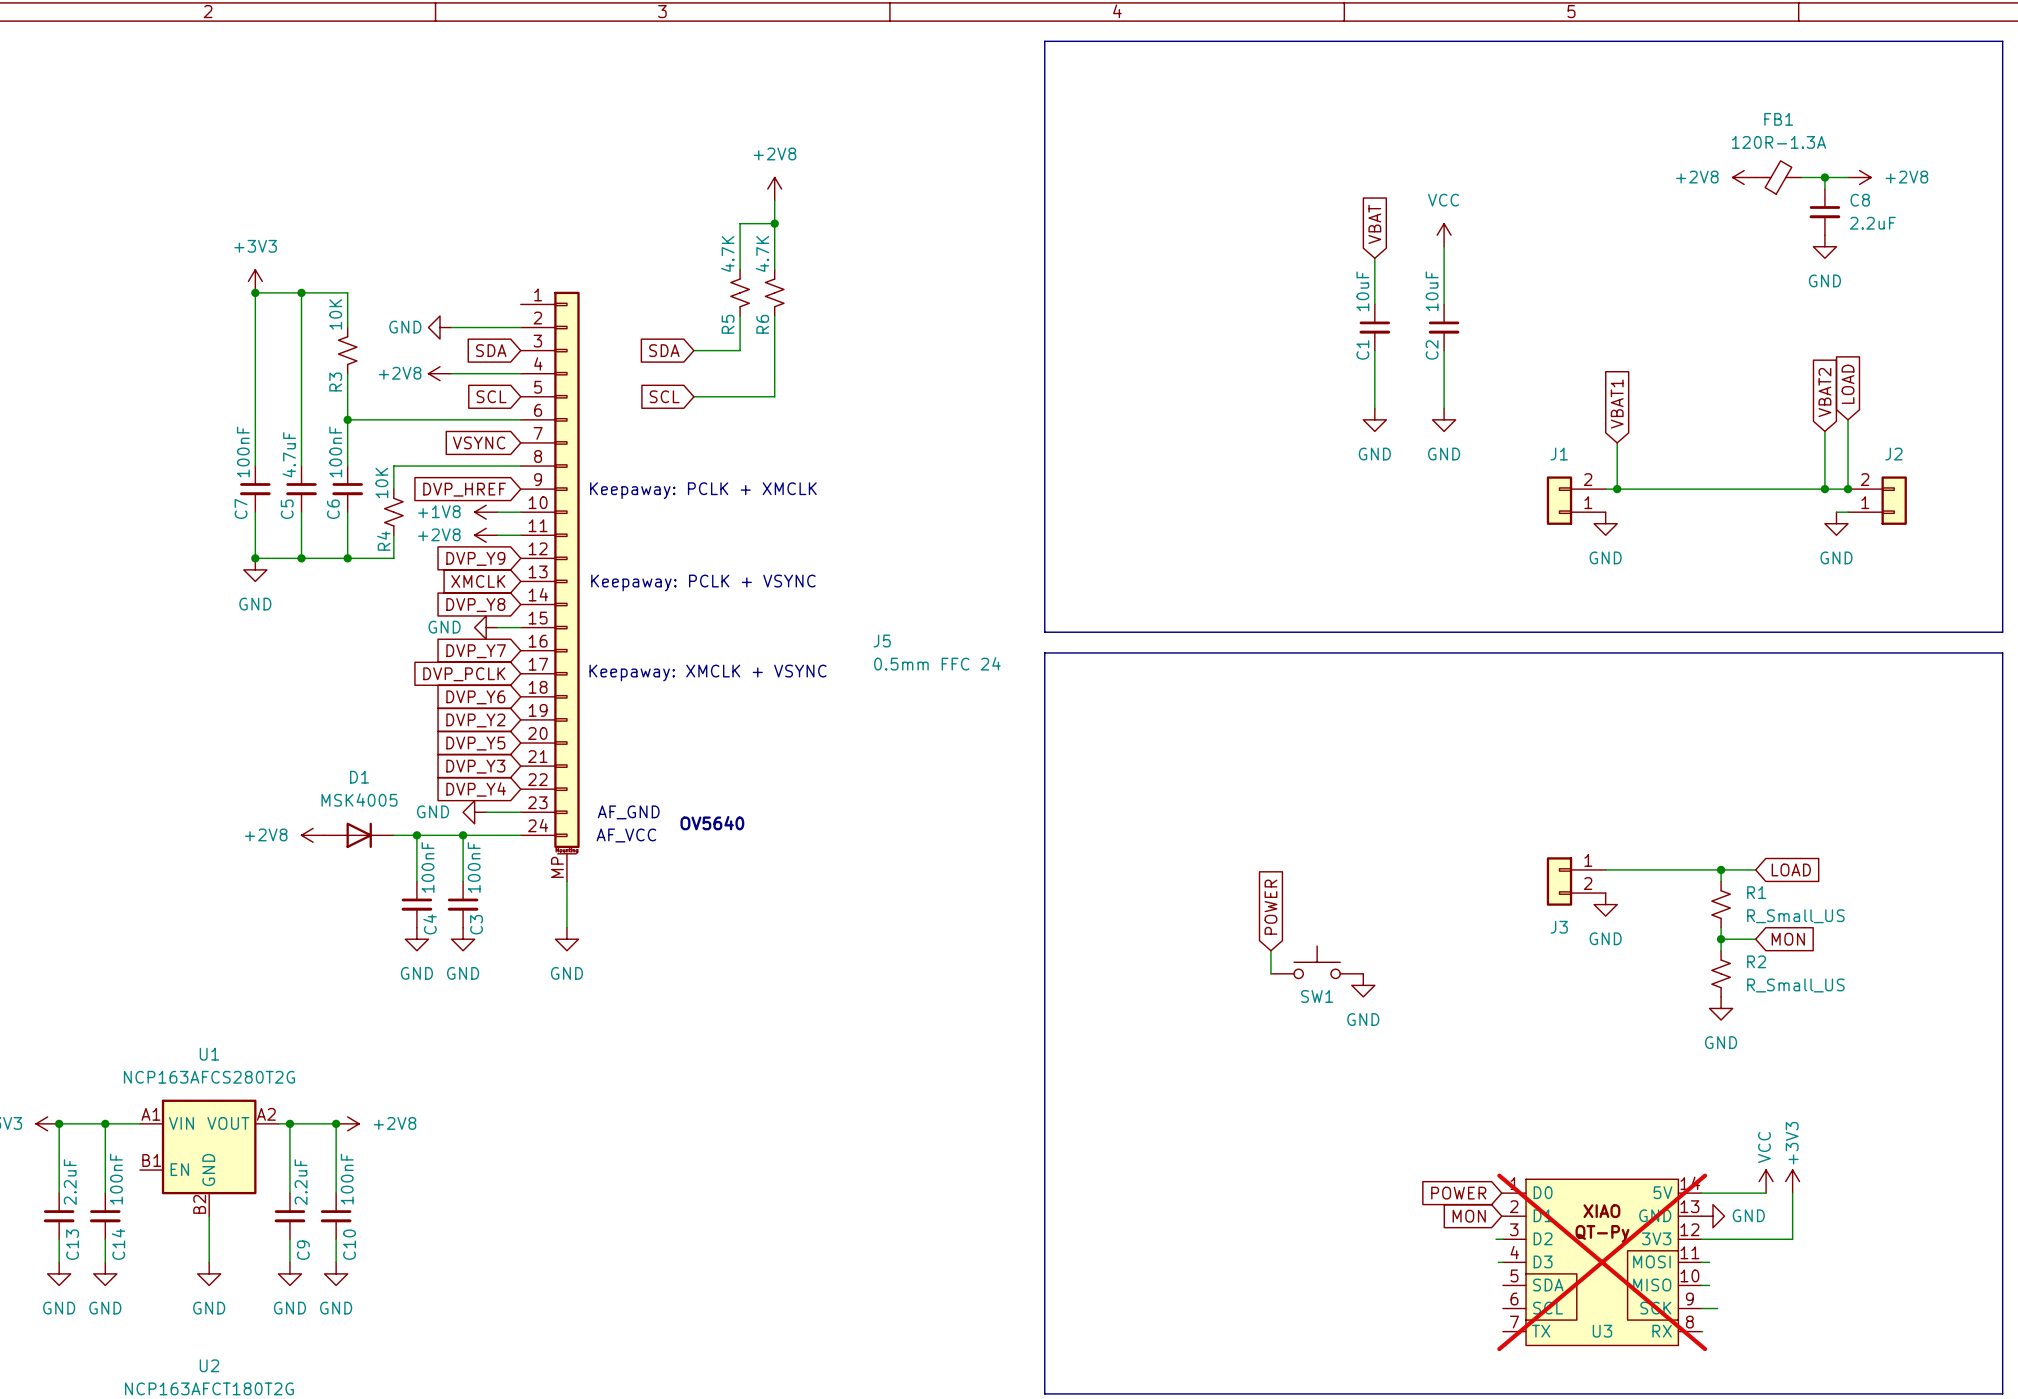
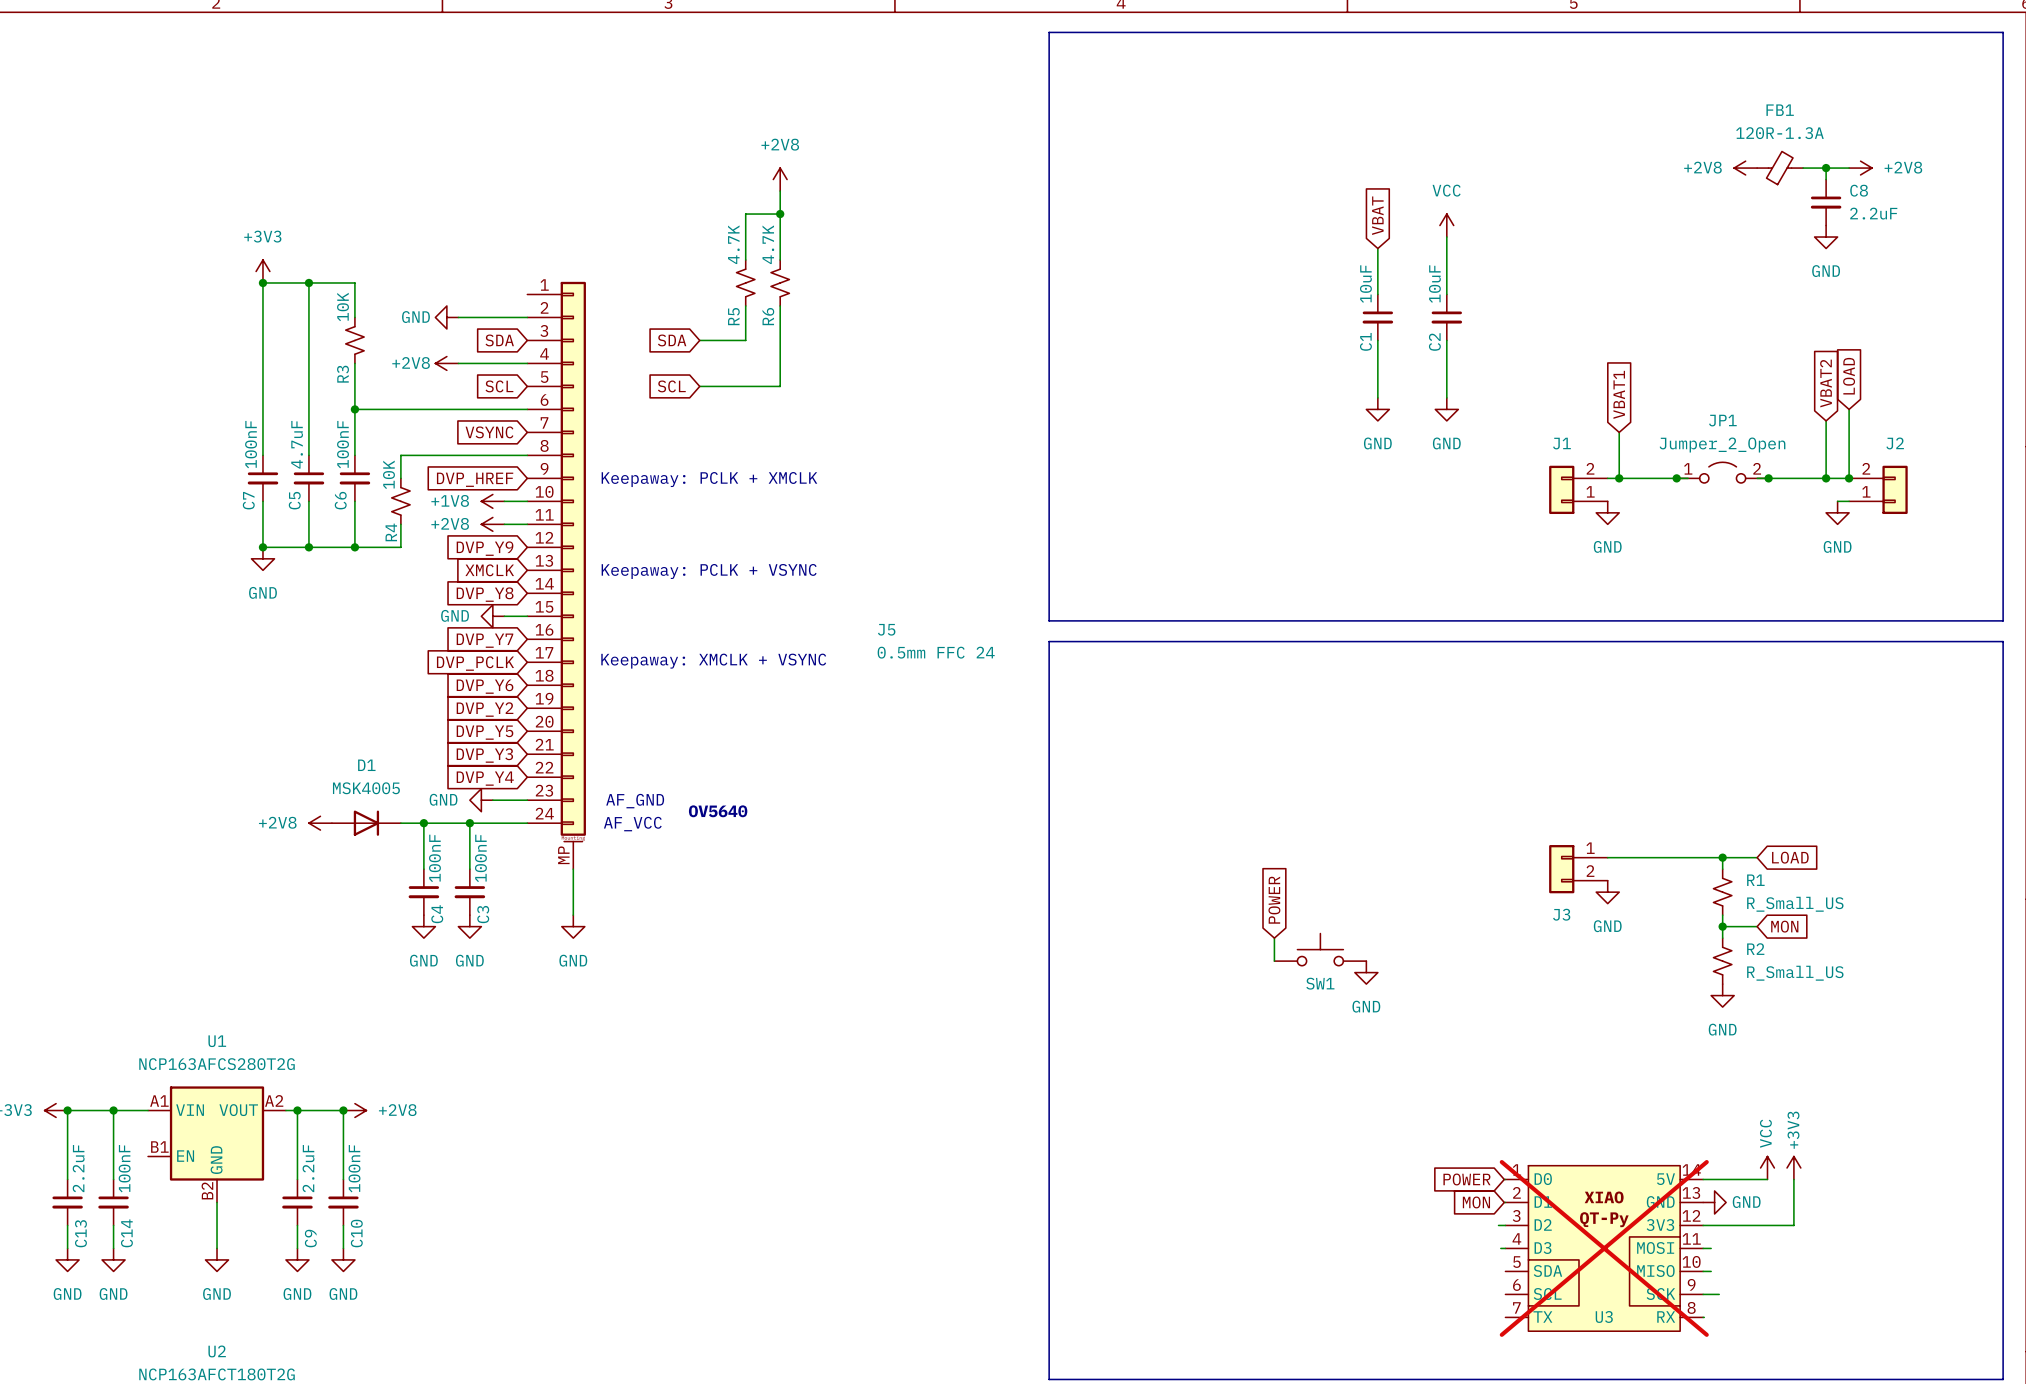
JP1: none -> Jumper_2_Open (1722, 472)
junction: none -> (1676, 478)
wire: (1686, 489) (1755, 489) -> none
junction: none -> (1768, 478)

